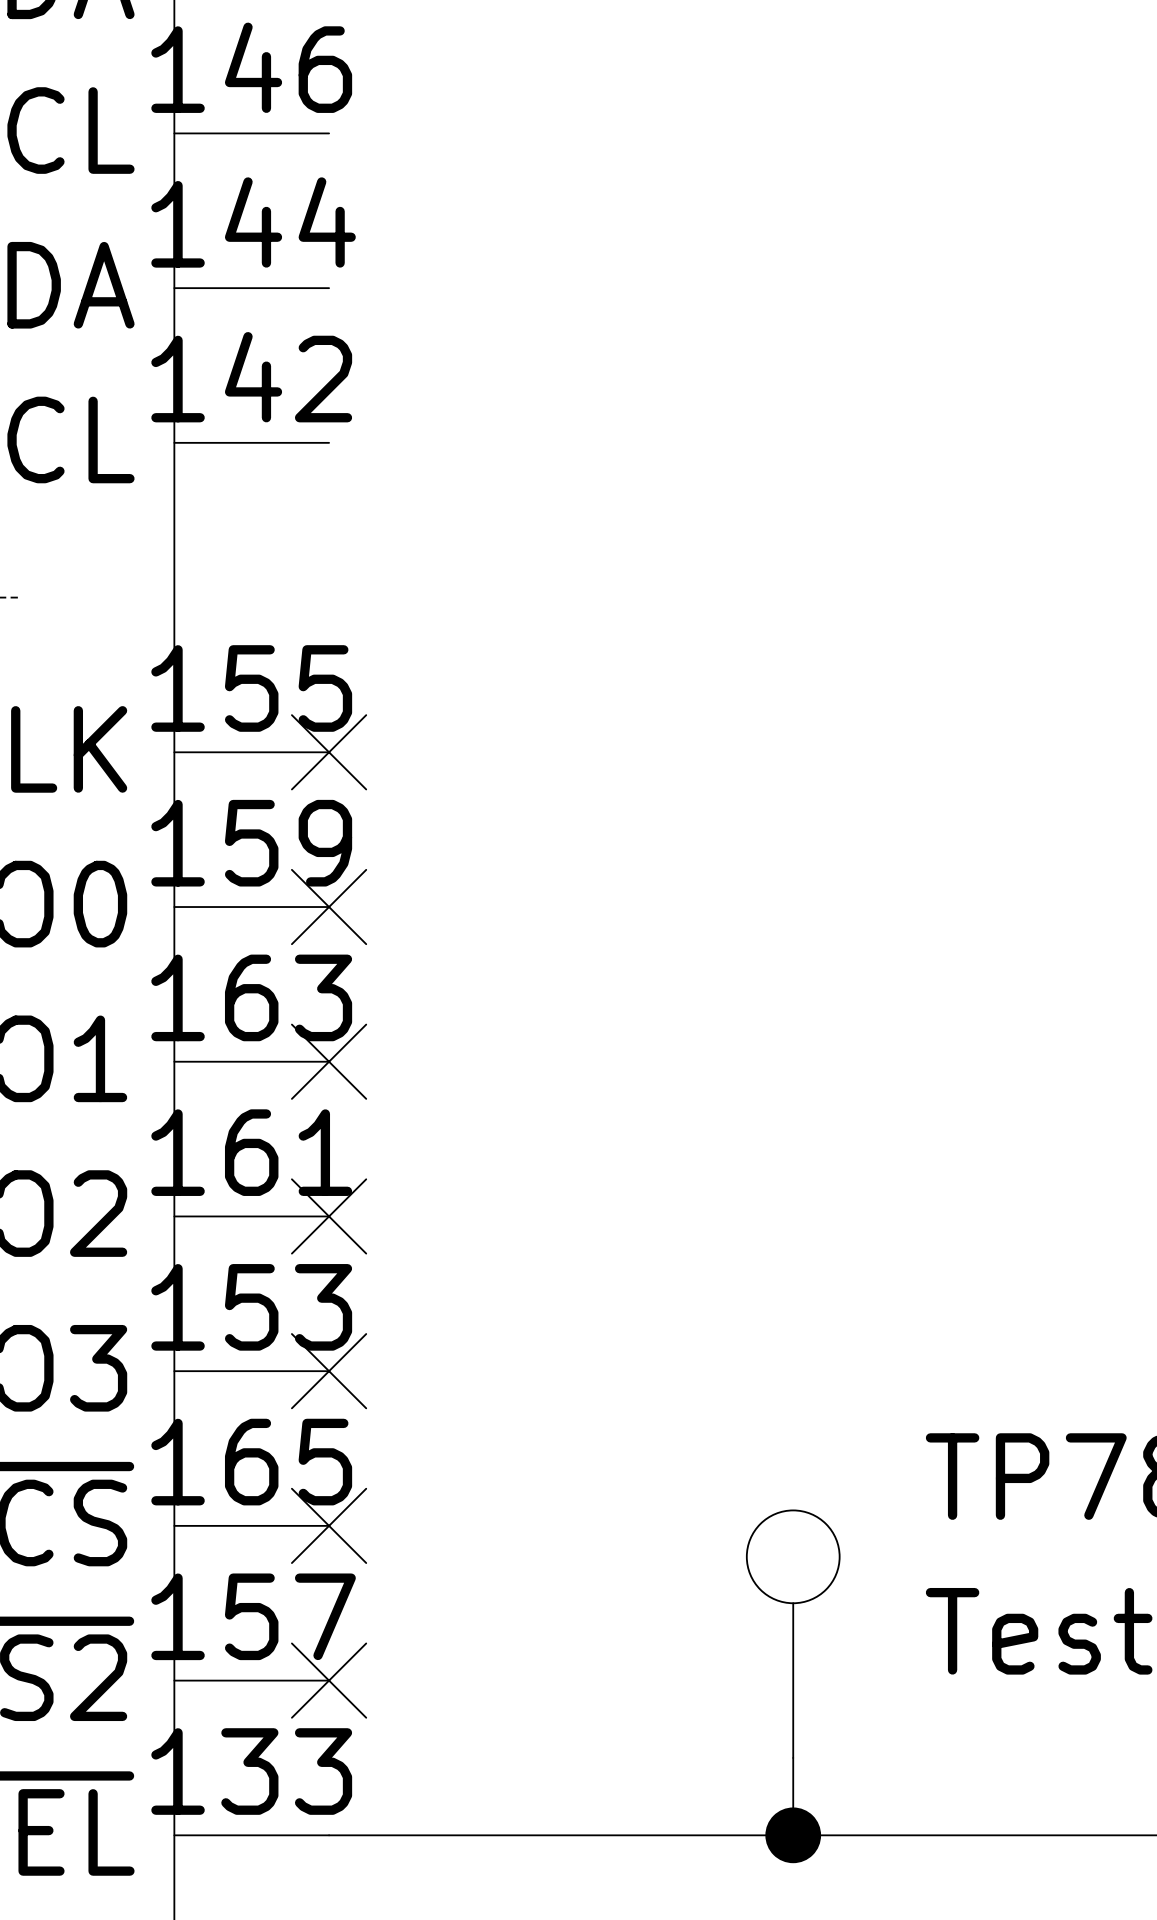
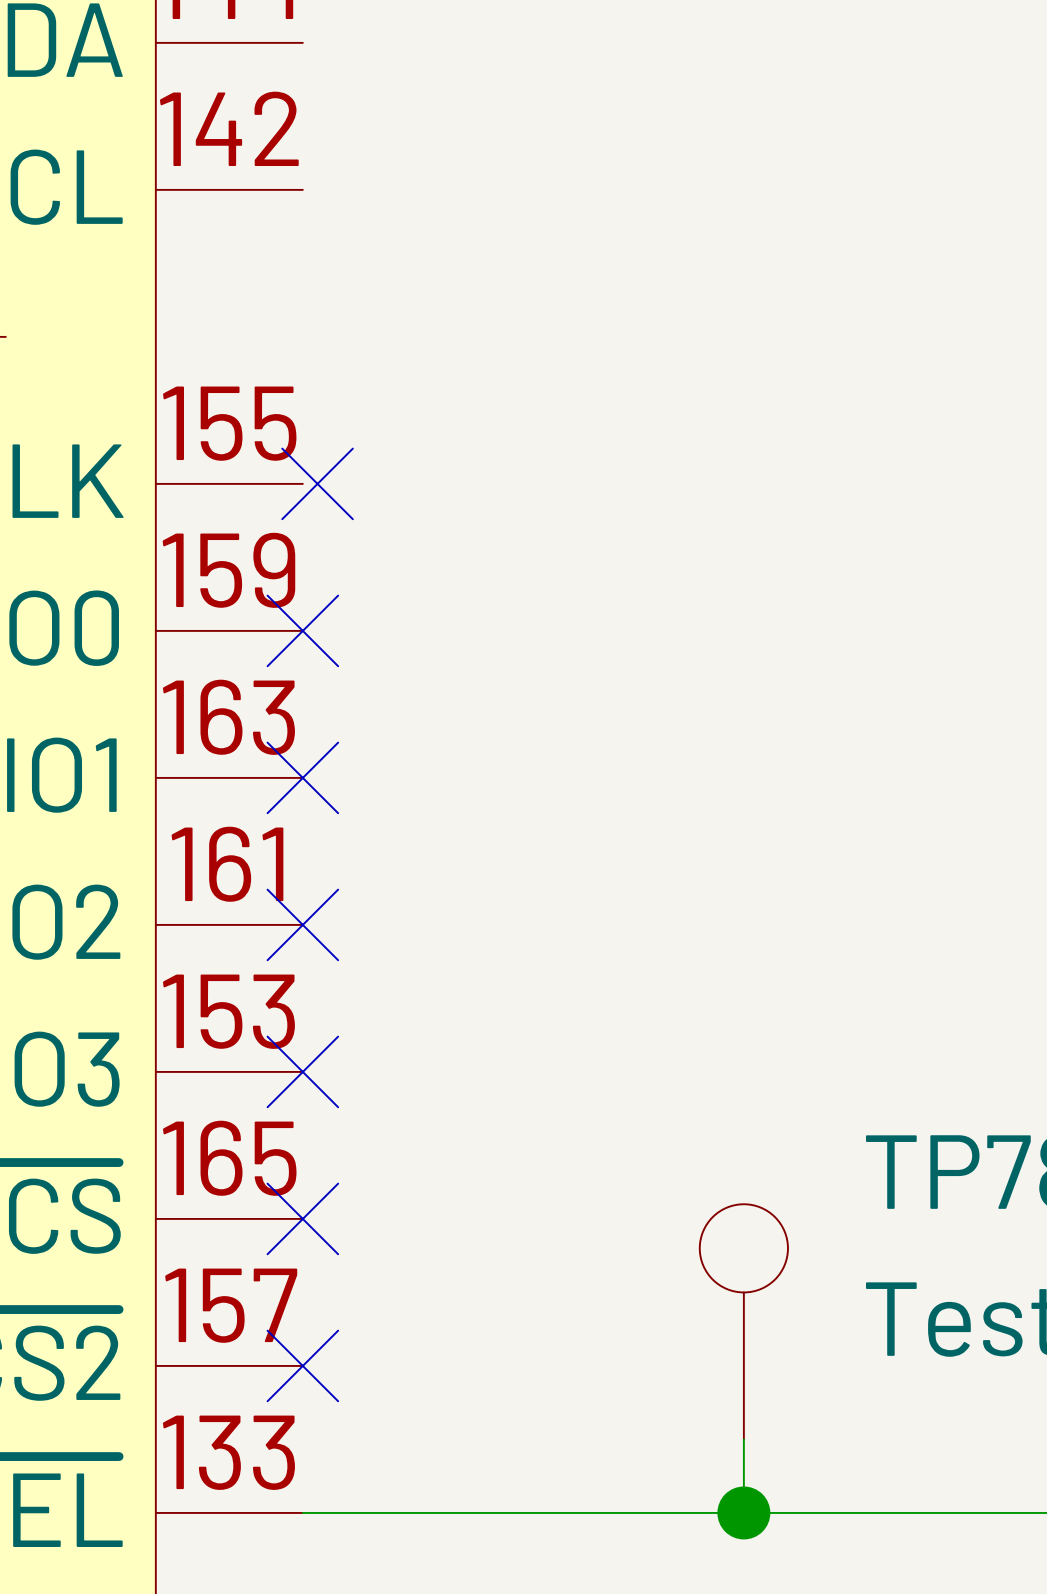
no-connect mark position: (329, 752) -> (317, 483)

